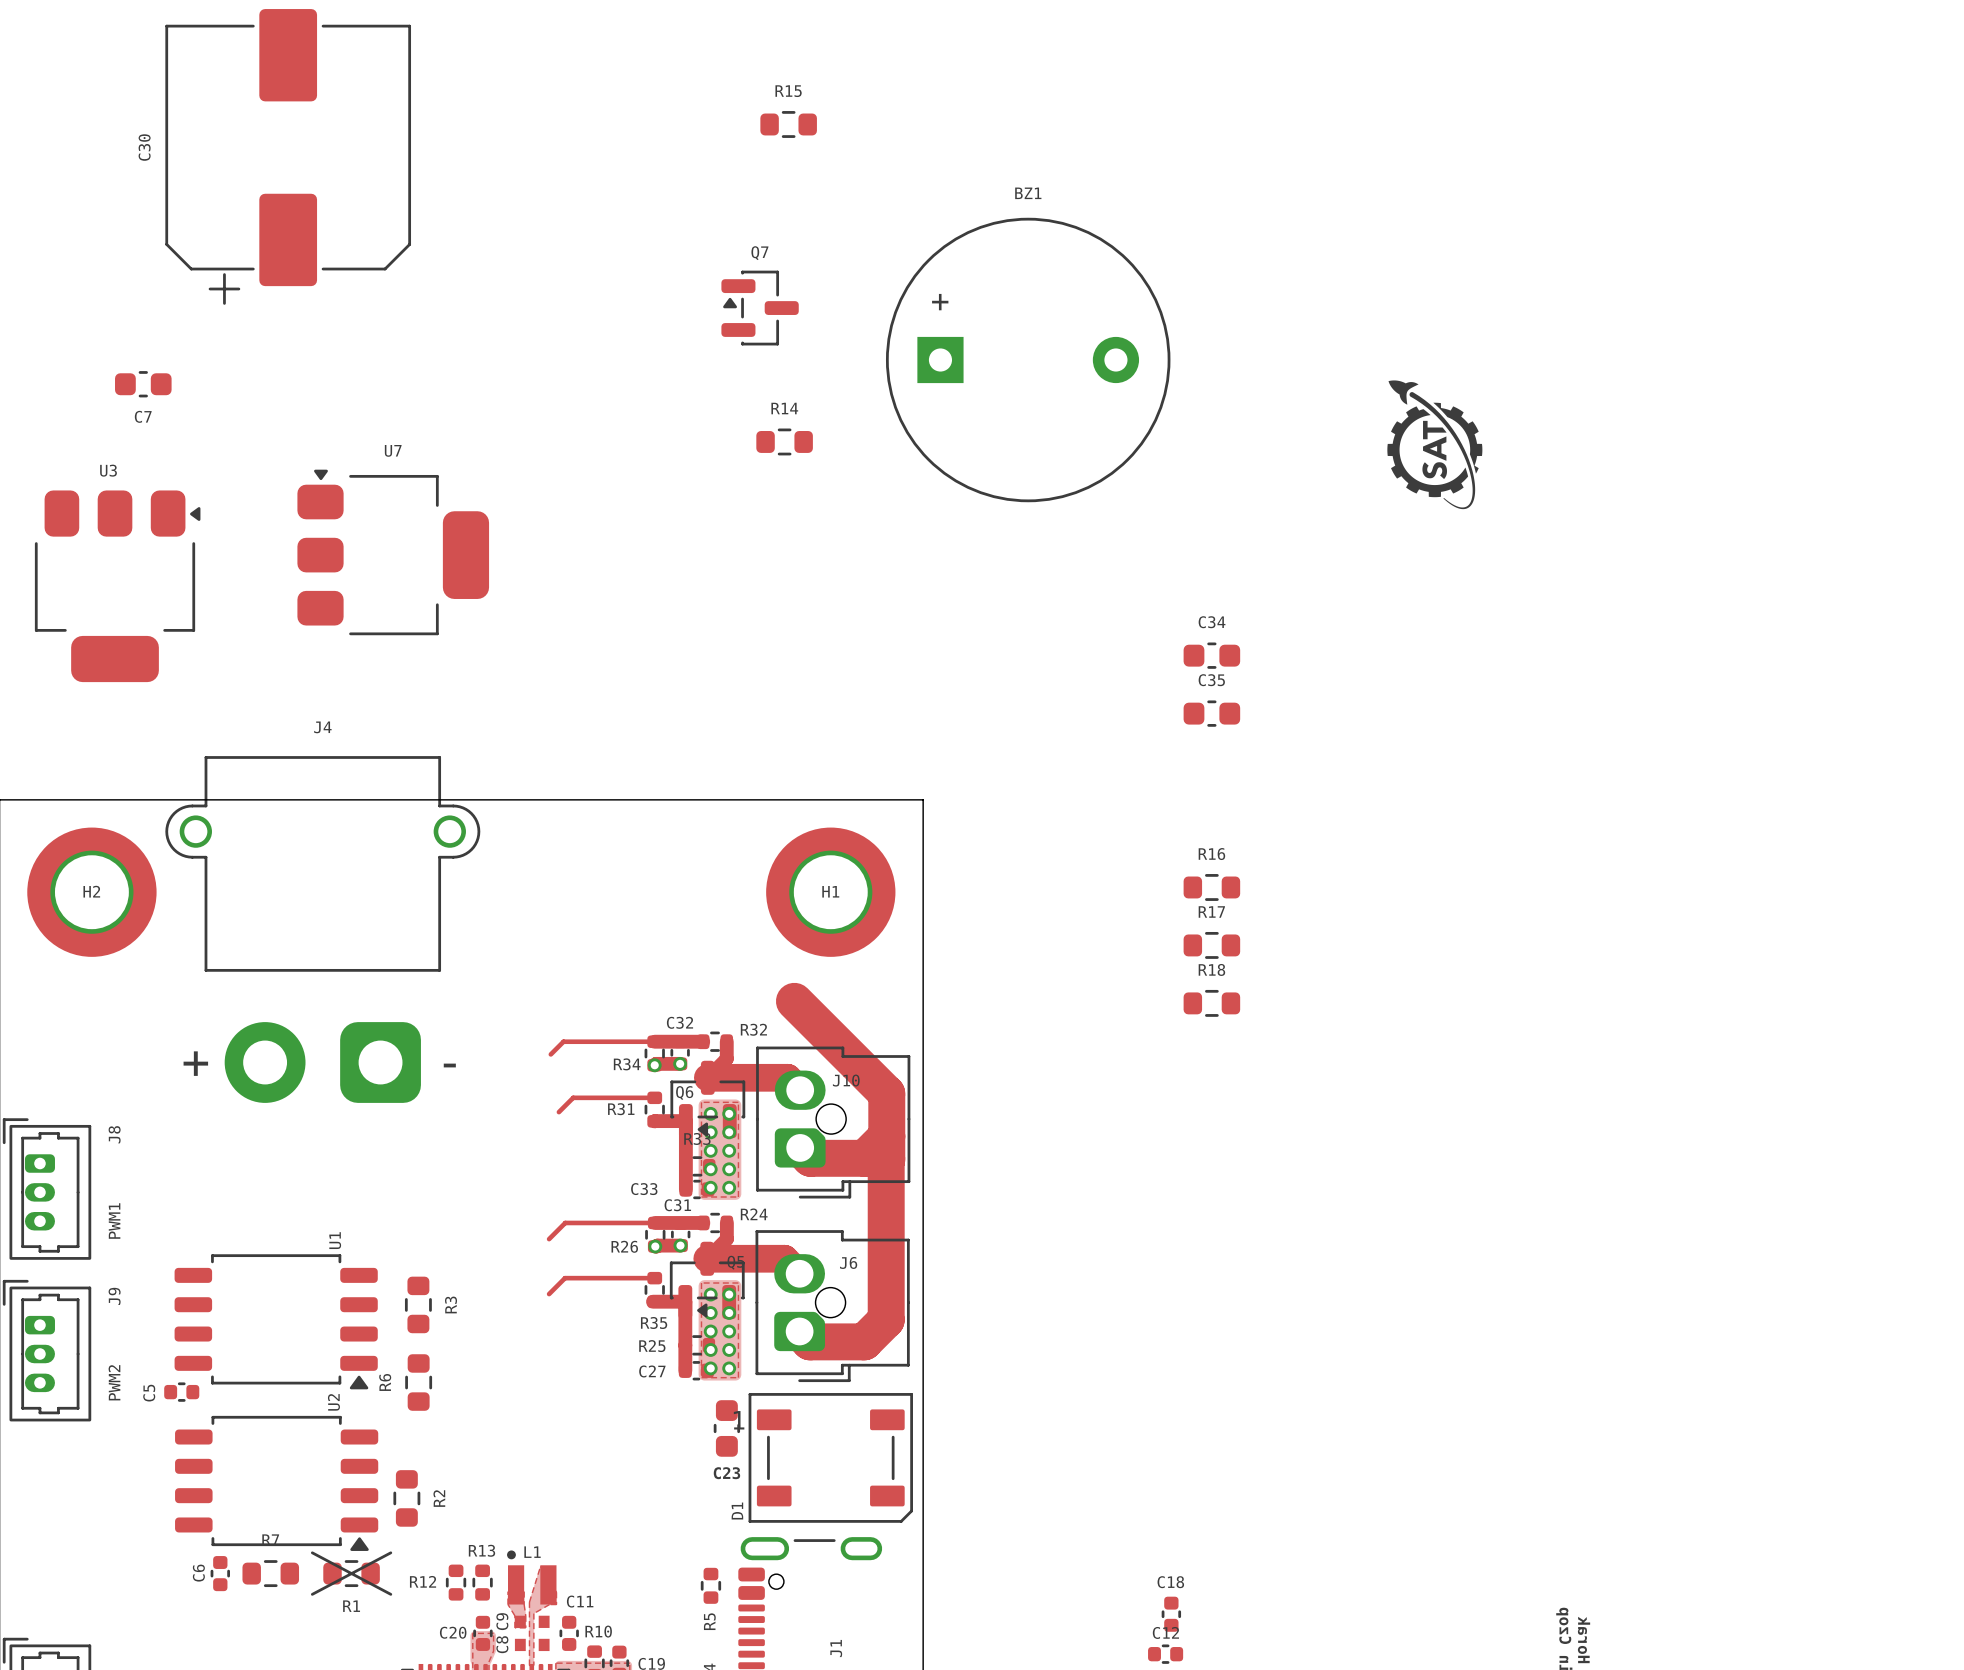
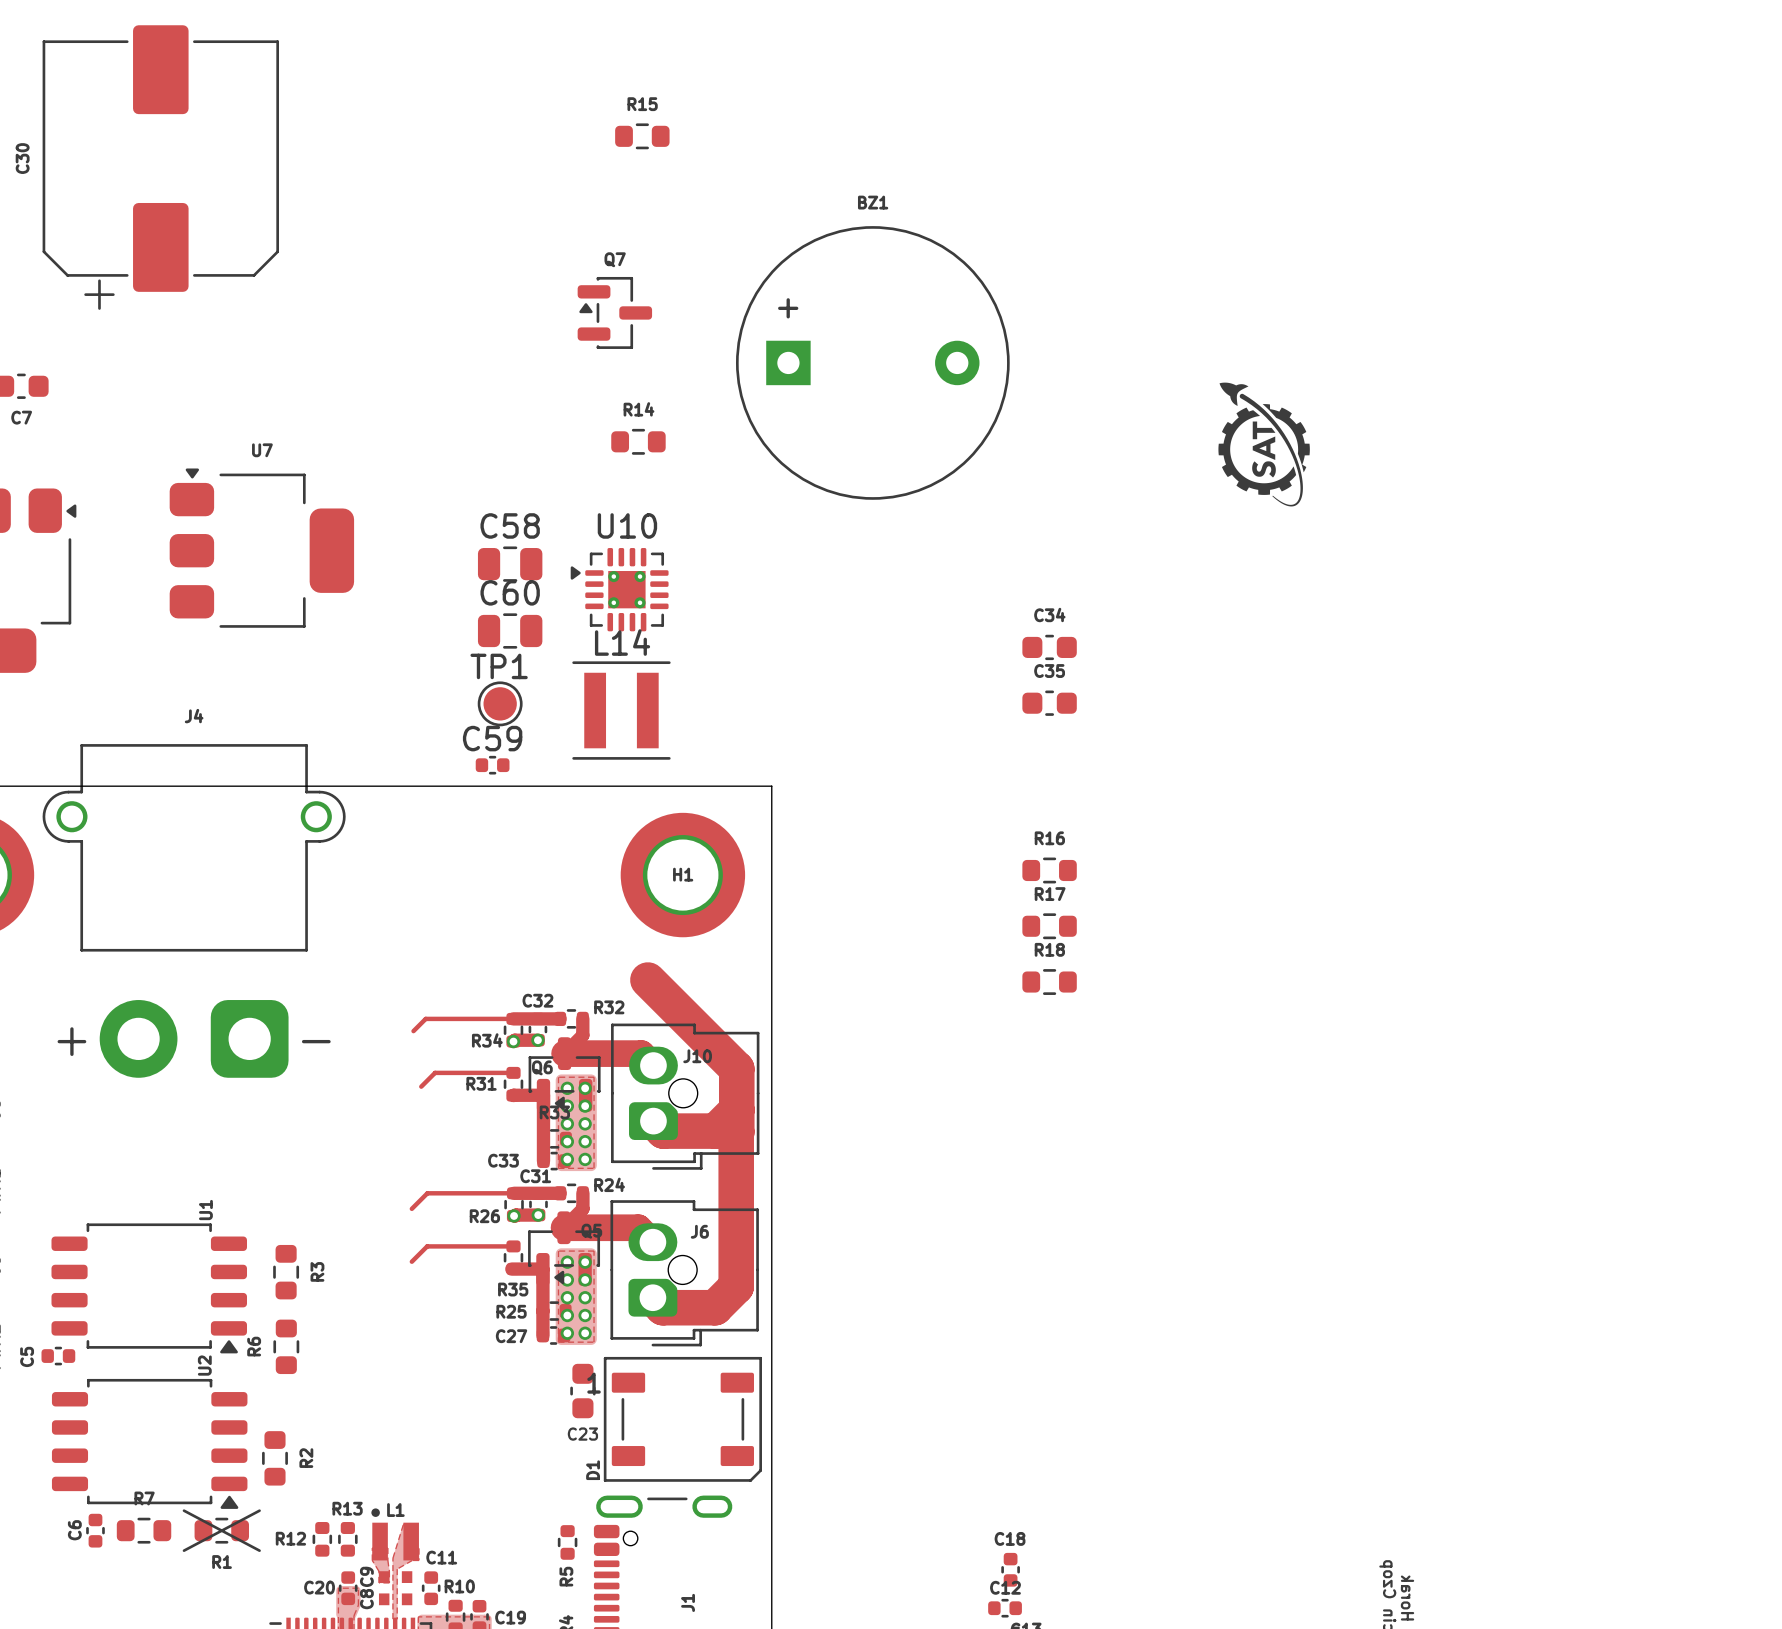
C58: none -> (510, 564)
U10: none -> (619, 589)
C60: none -> (510, 630)
TP1: none -> (500, 703)
L14: none -> (621, 710)
C59: none -> (492, 765)

